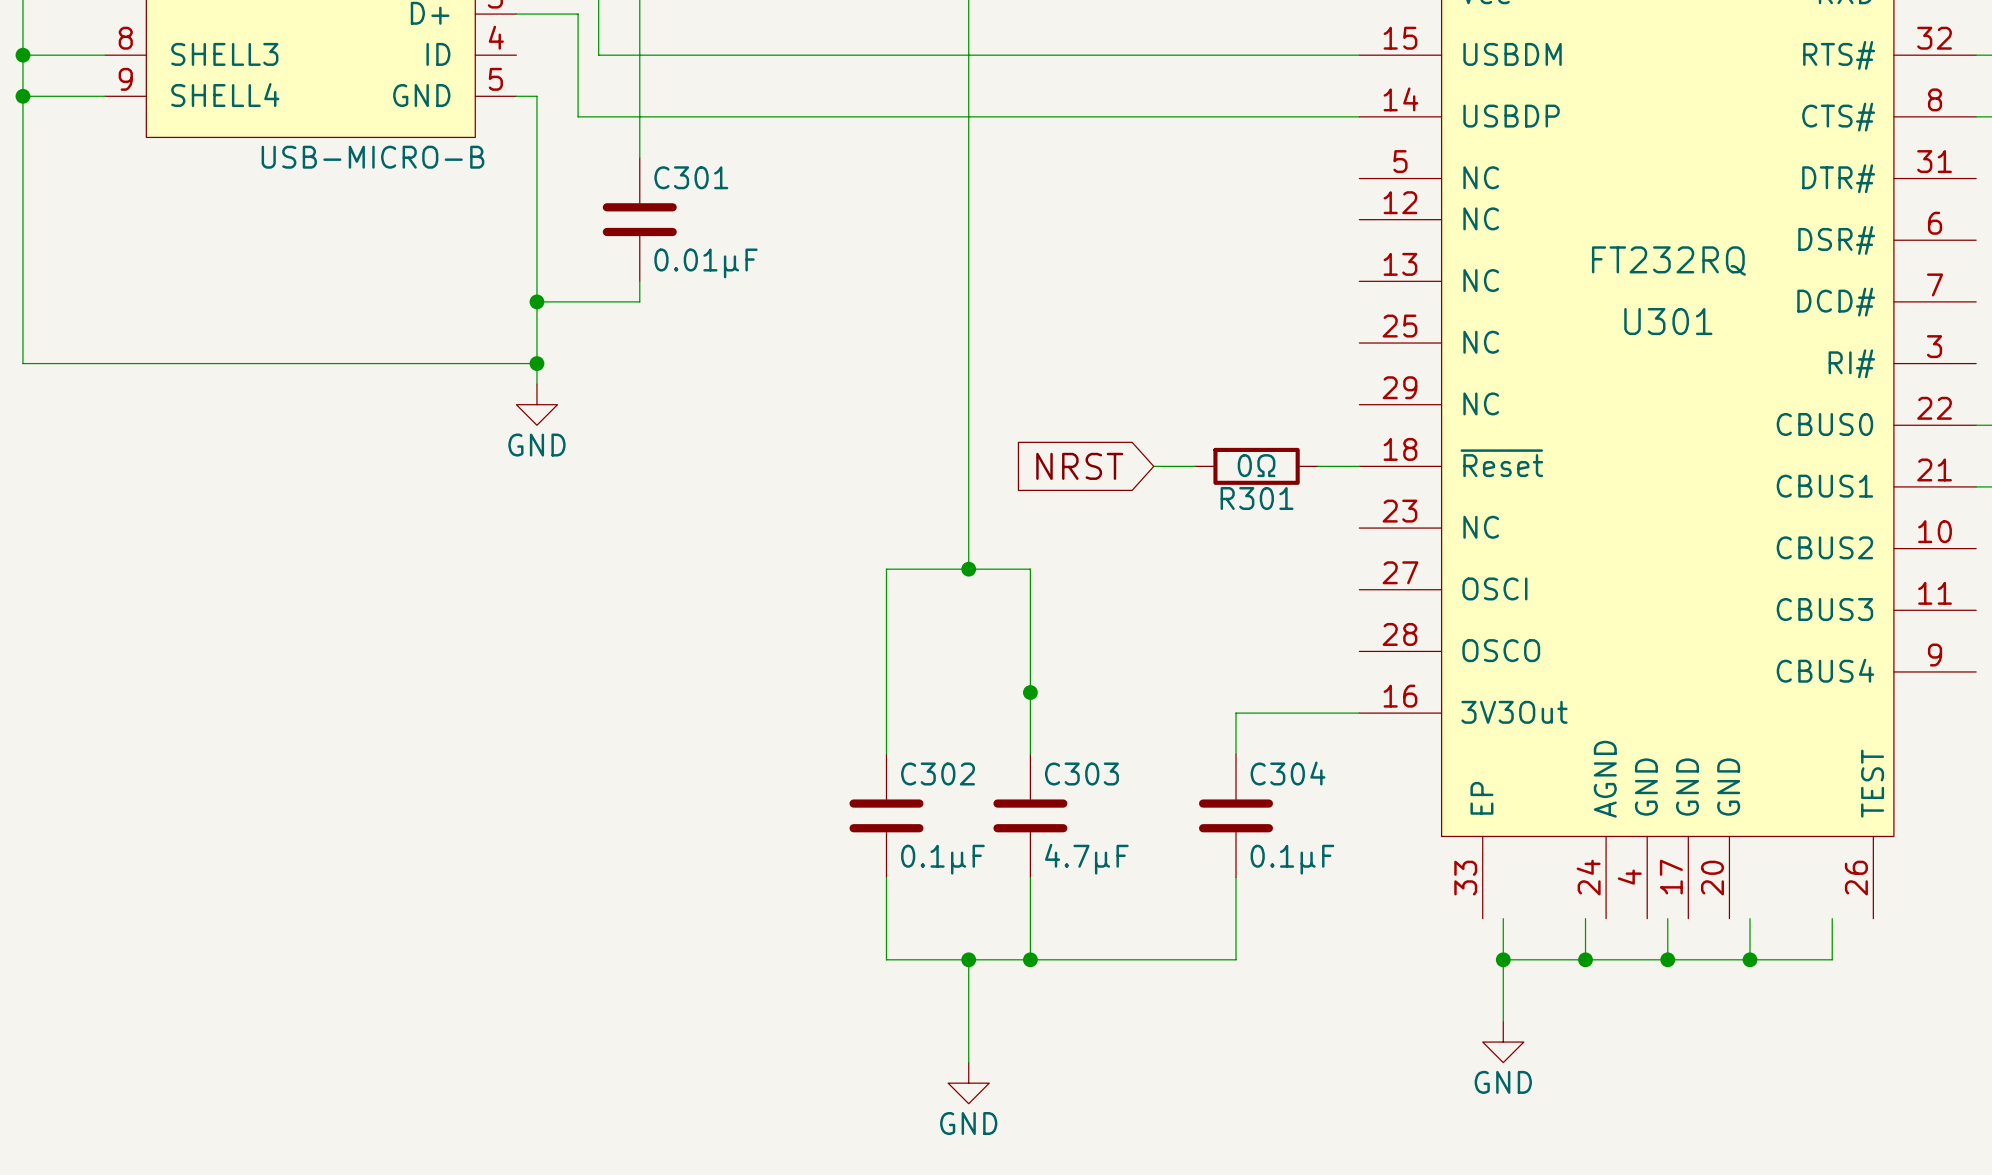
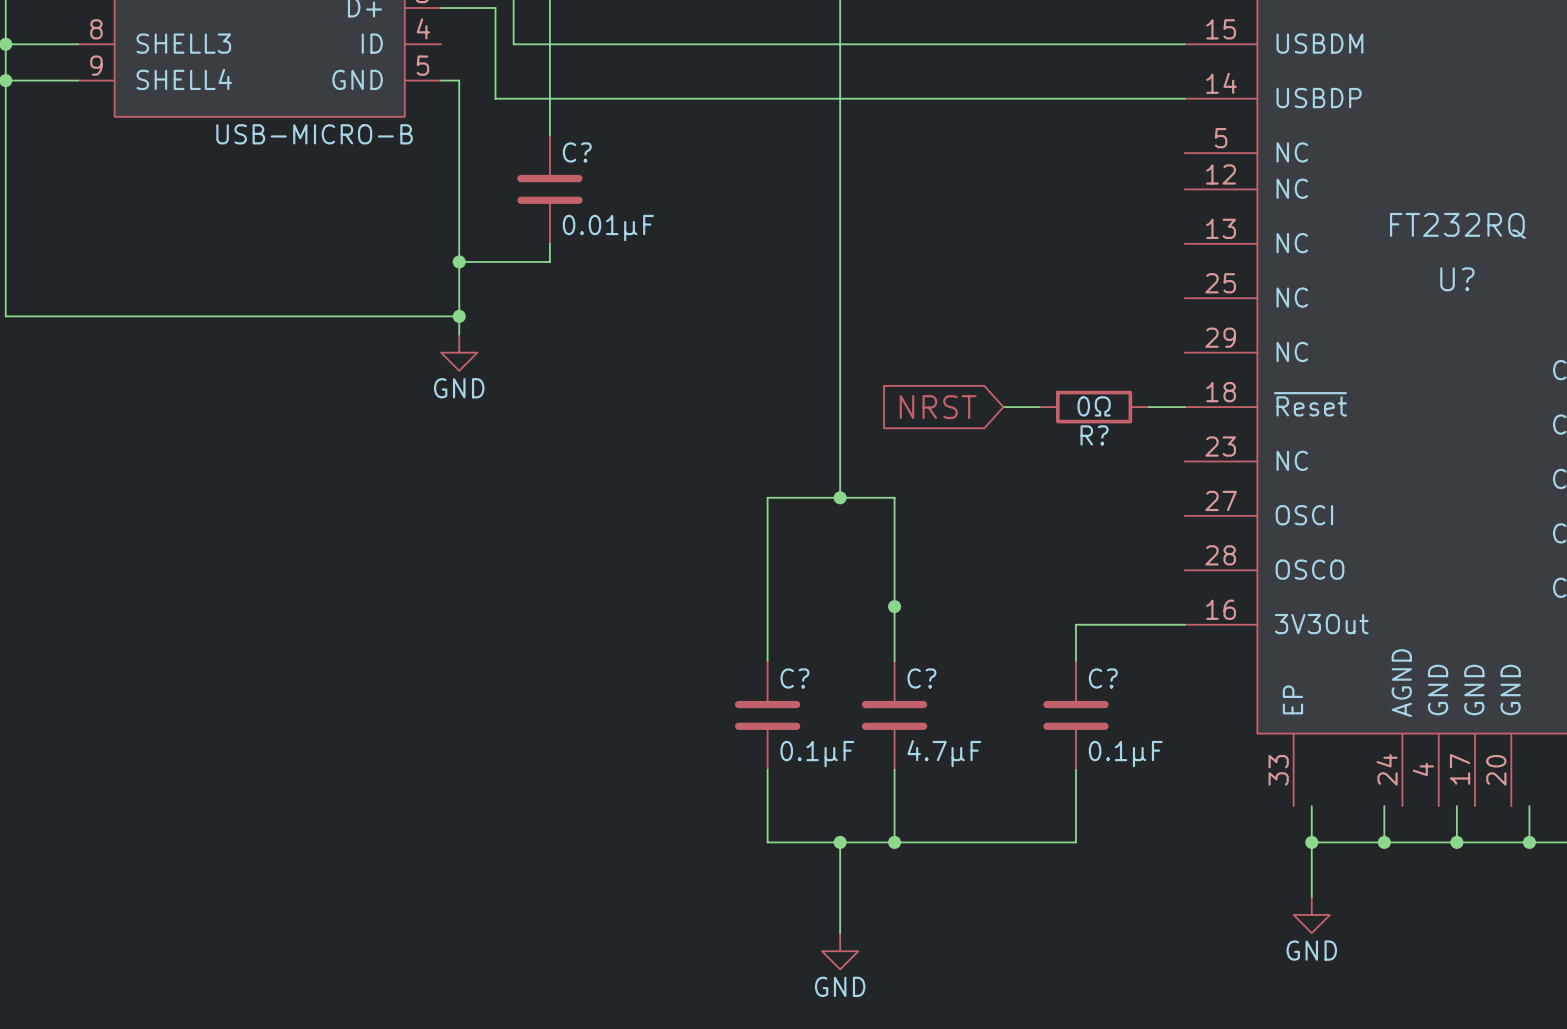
C301 name: C301 (691, 177) -> C? (577, 152)
U301 name: U301 (1668, 321) -> U? (1457, 279)
R301 name: R301 (1257, 498) -> R? (1094, 435)
C304 name: C304 (1288, 773) -> C? (1103, 678)
C302 name: C302 (938, 774) -> C? (794, 678)
C303 name: C303 (1081, 774) -> C? (921, 678)

